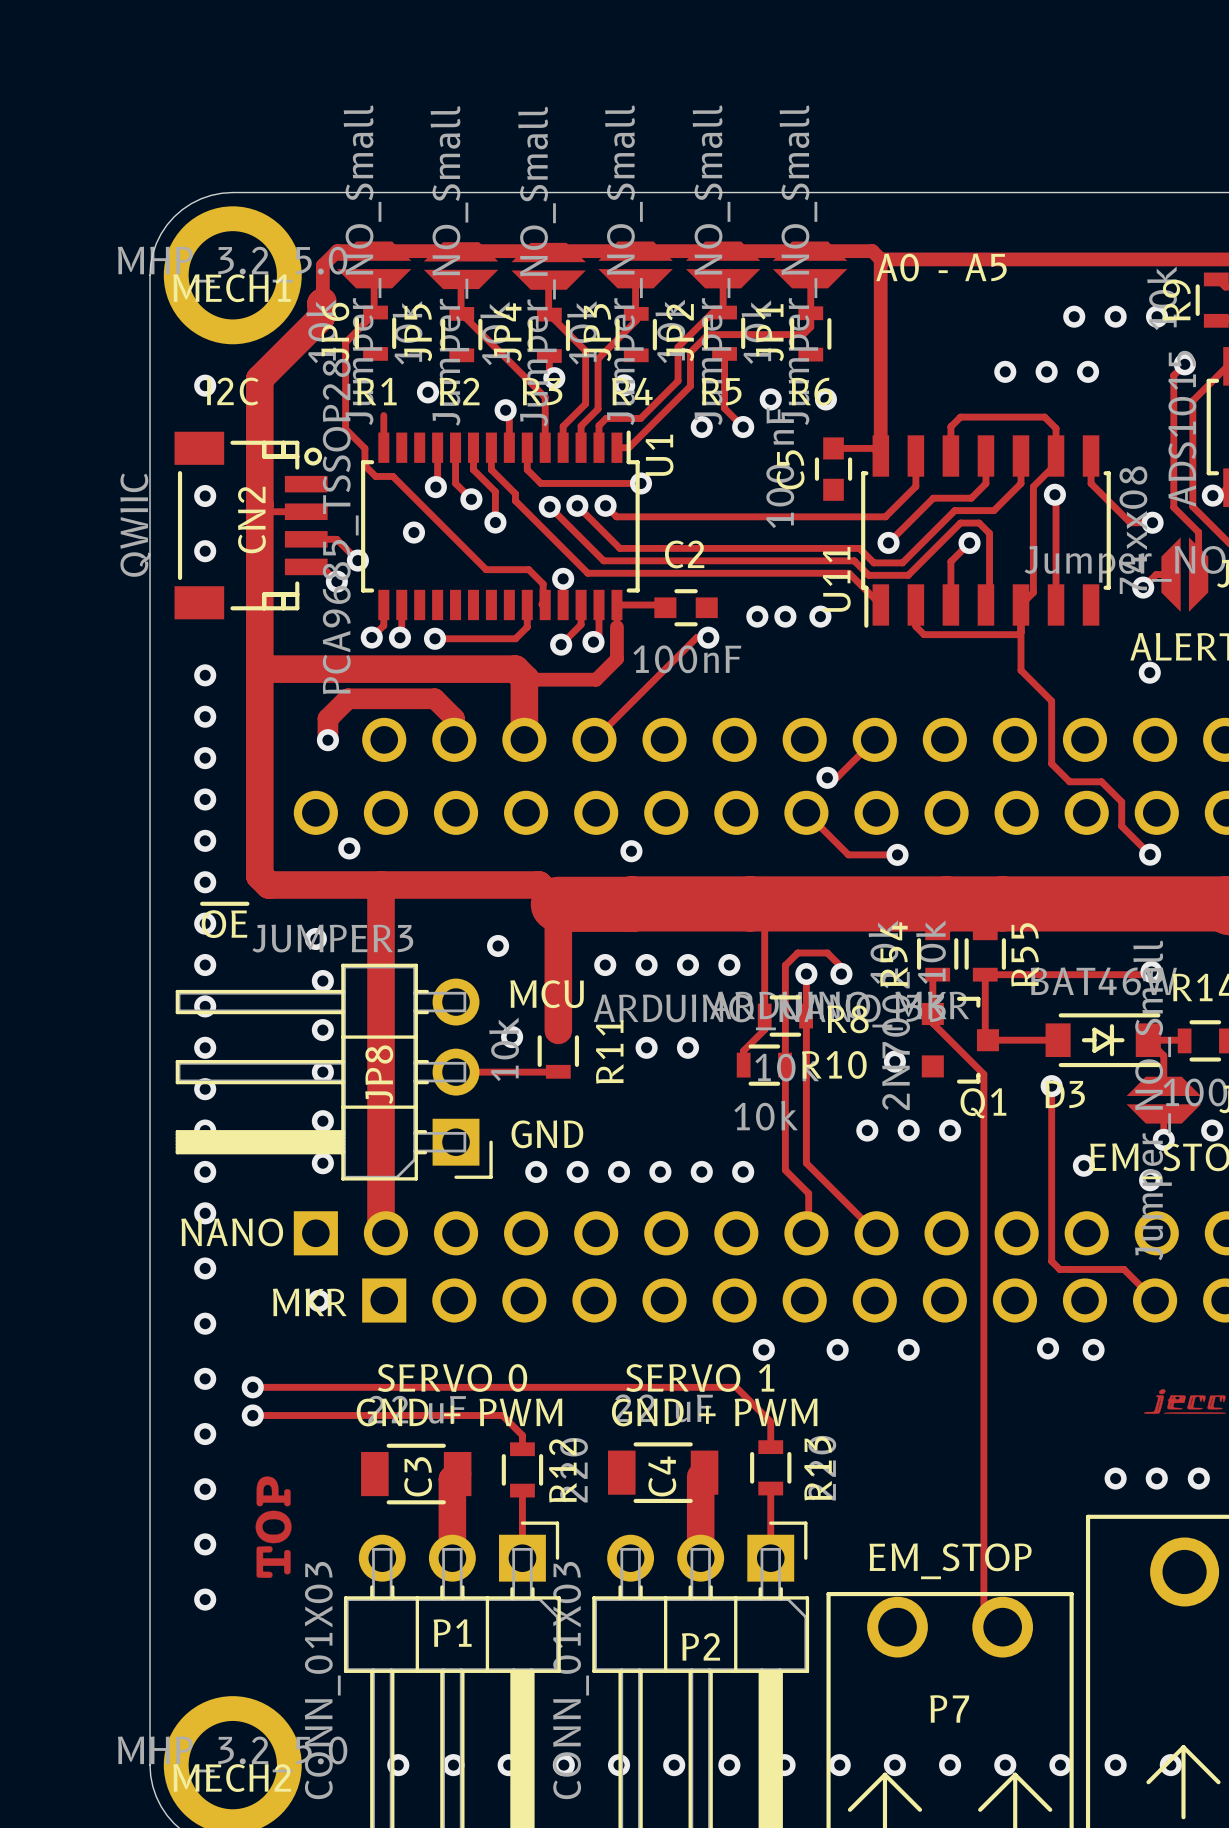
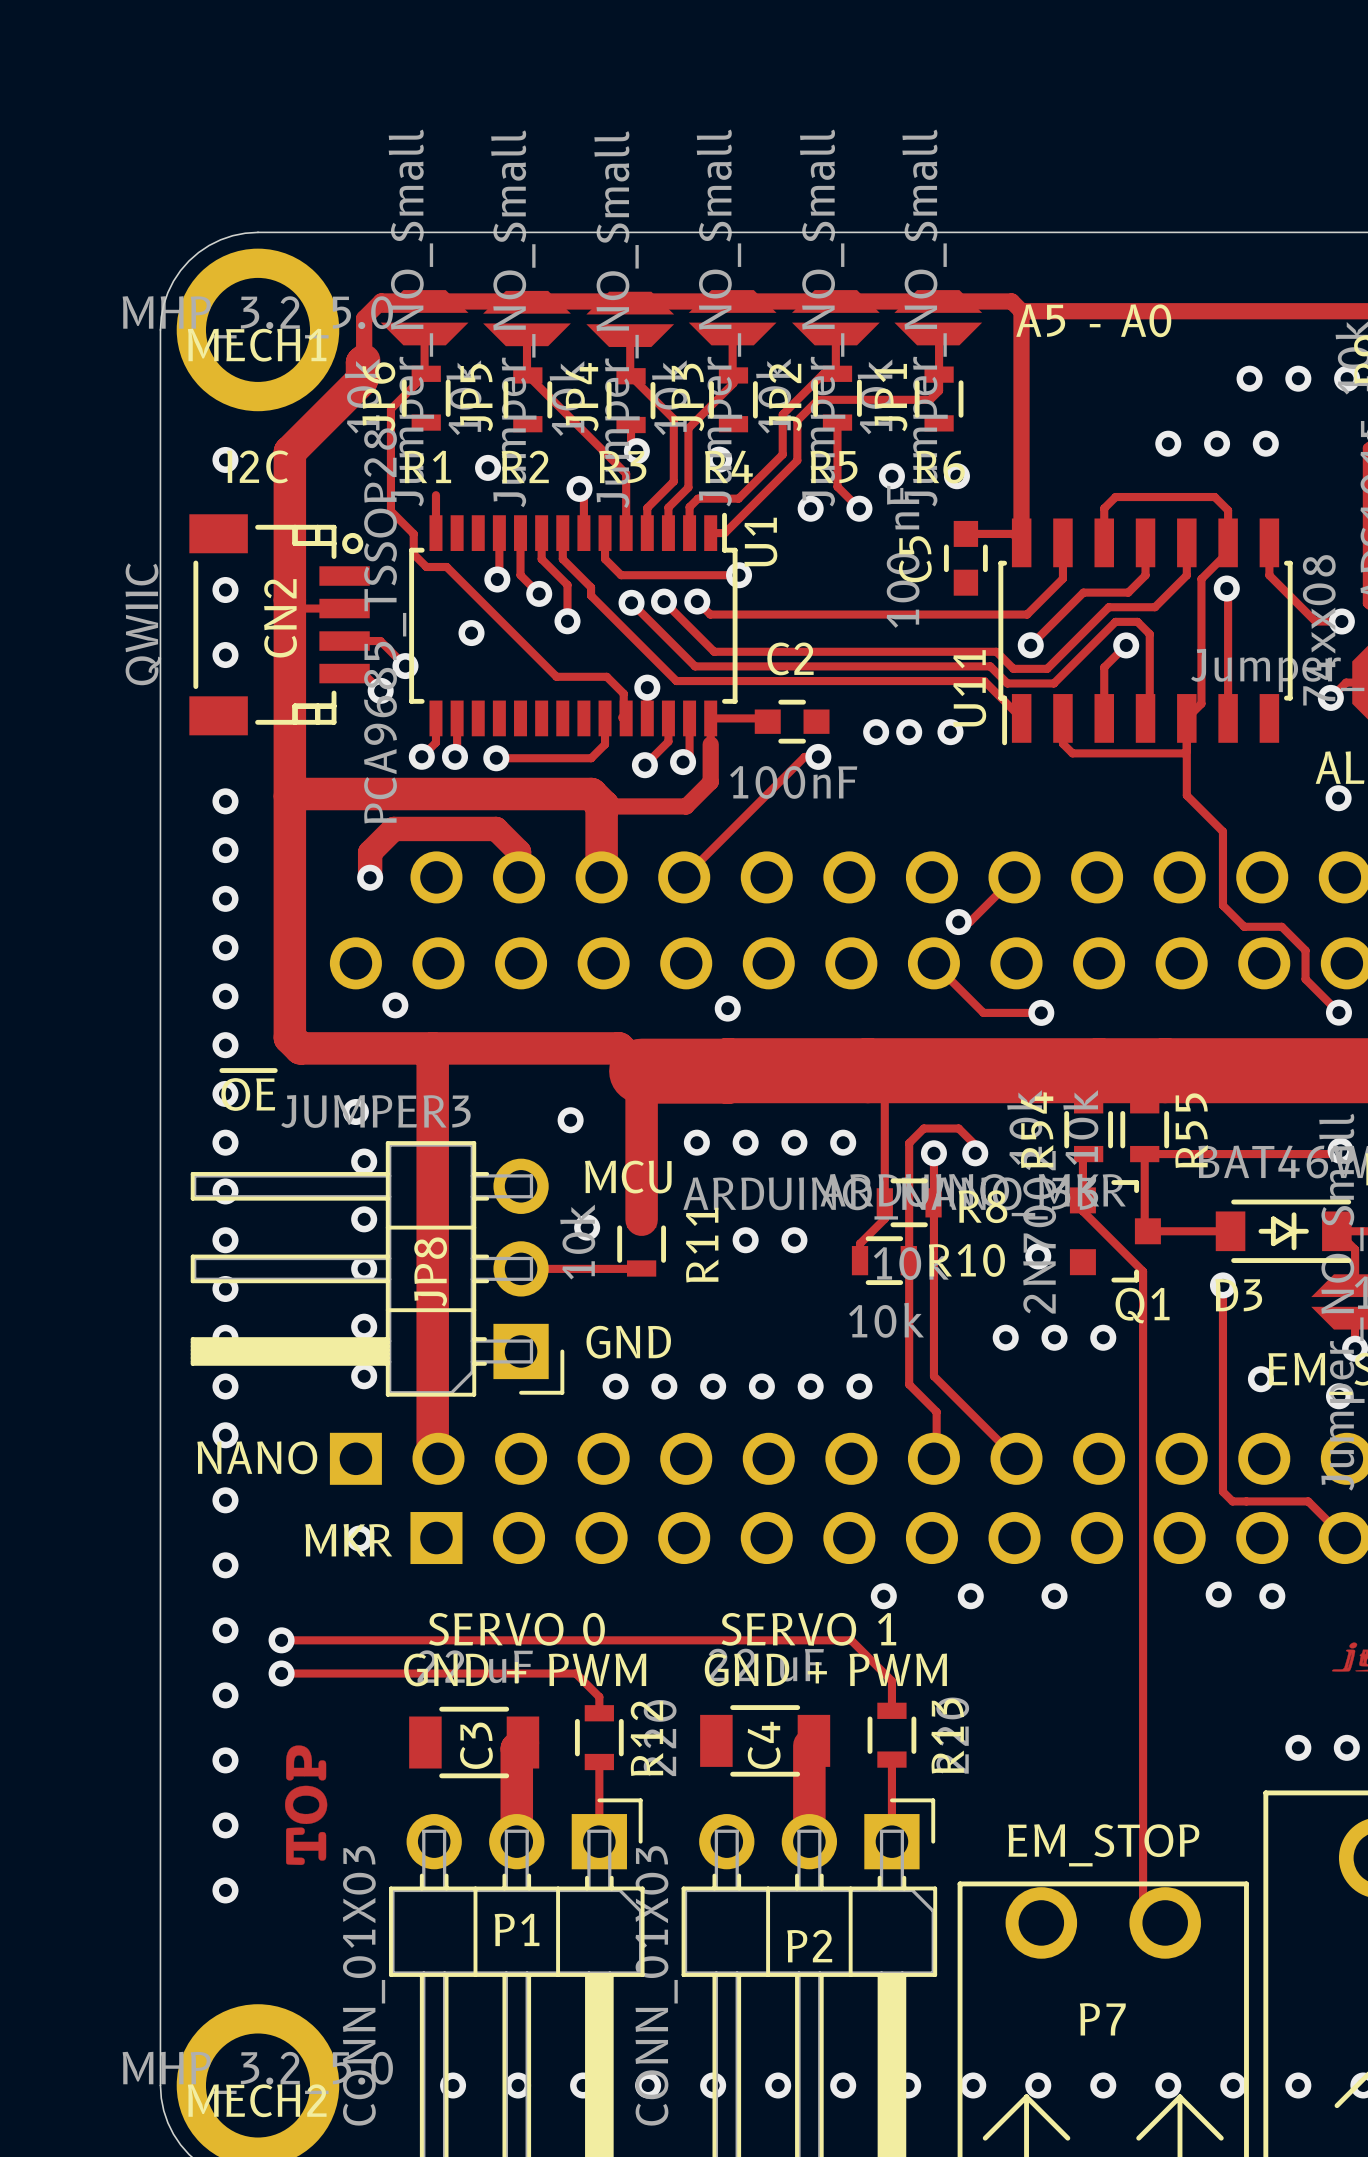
text: A0 - A5 (941, 267) -> A5 - A0 (1093, 320)

